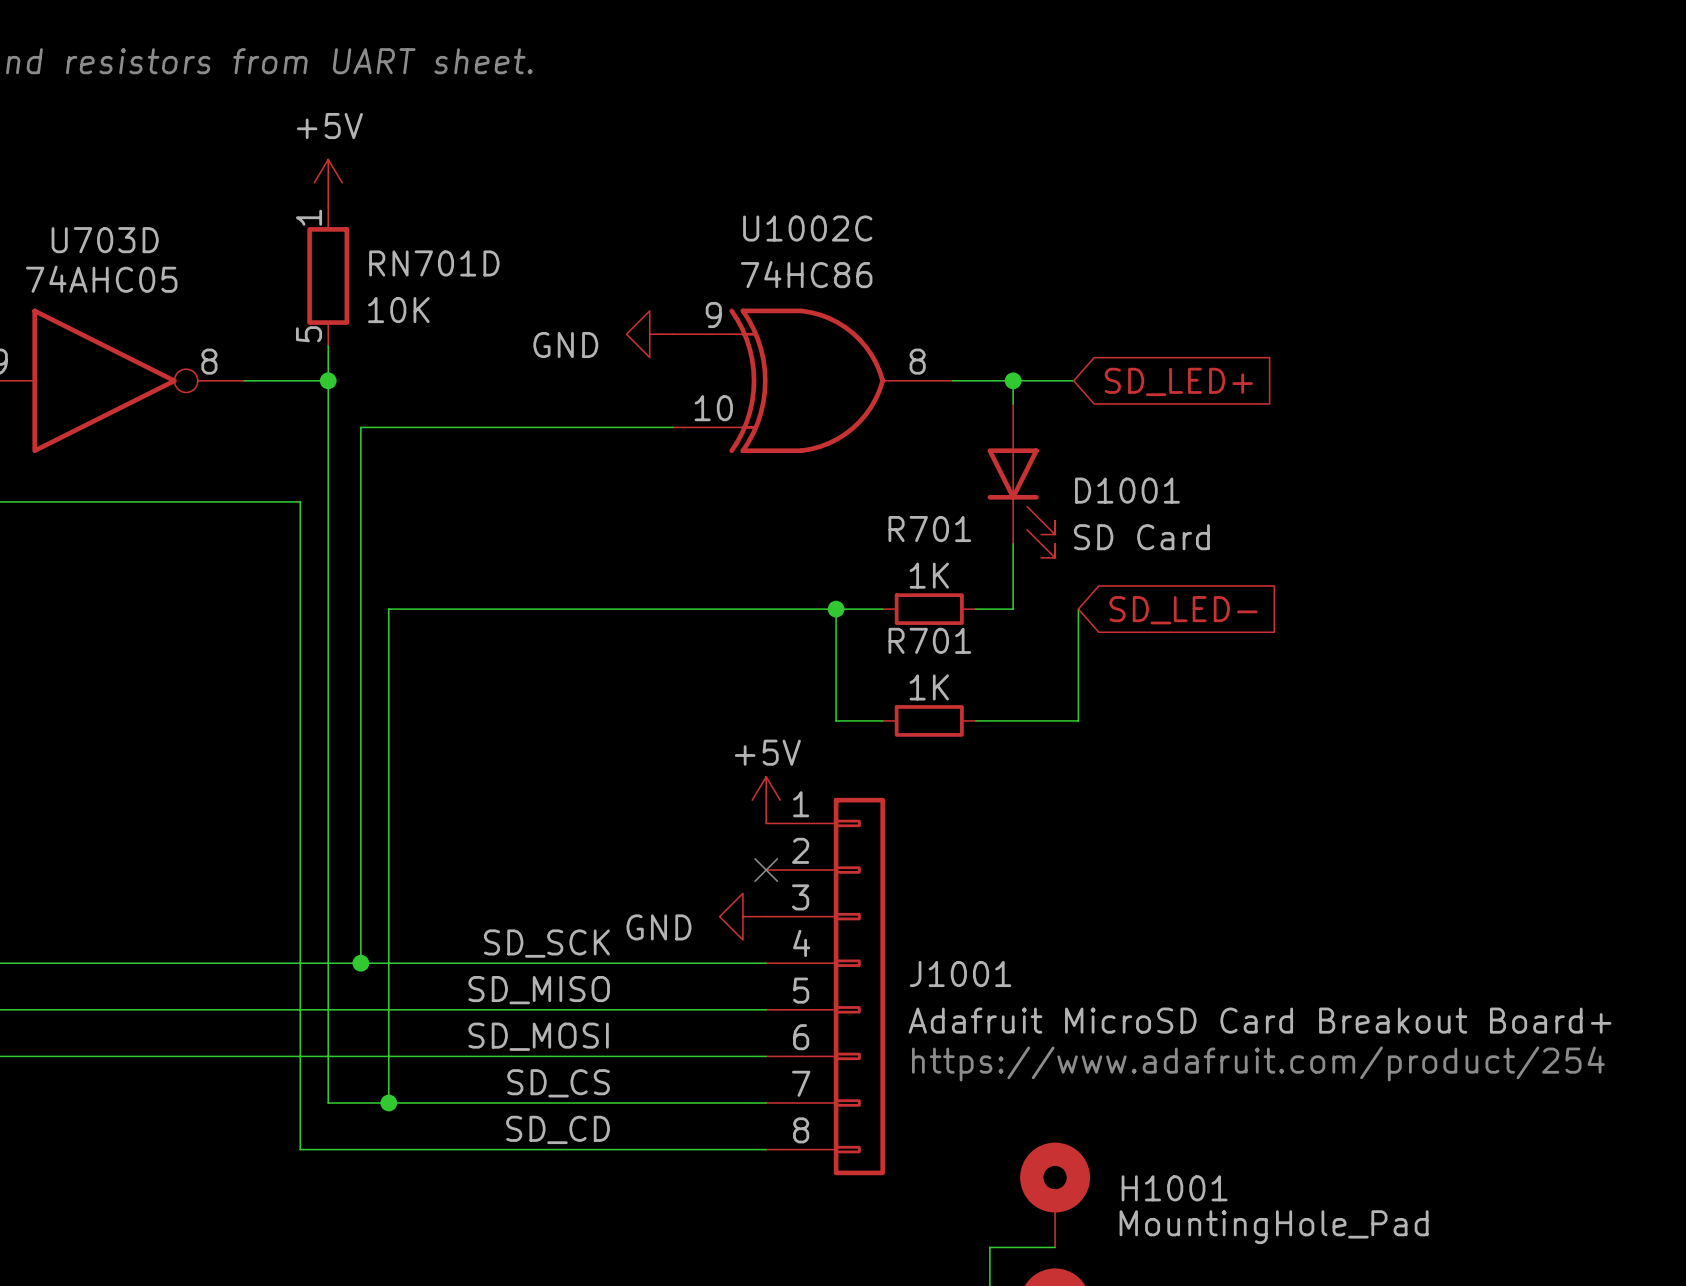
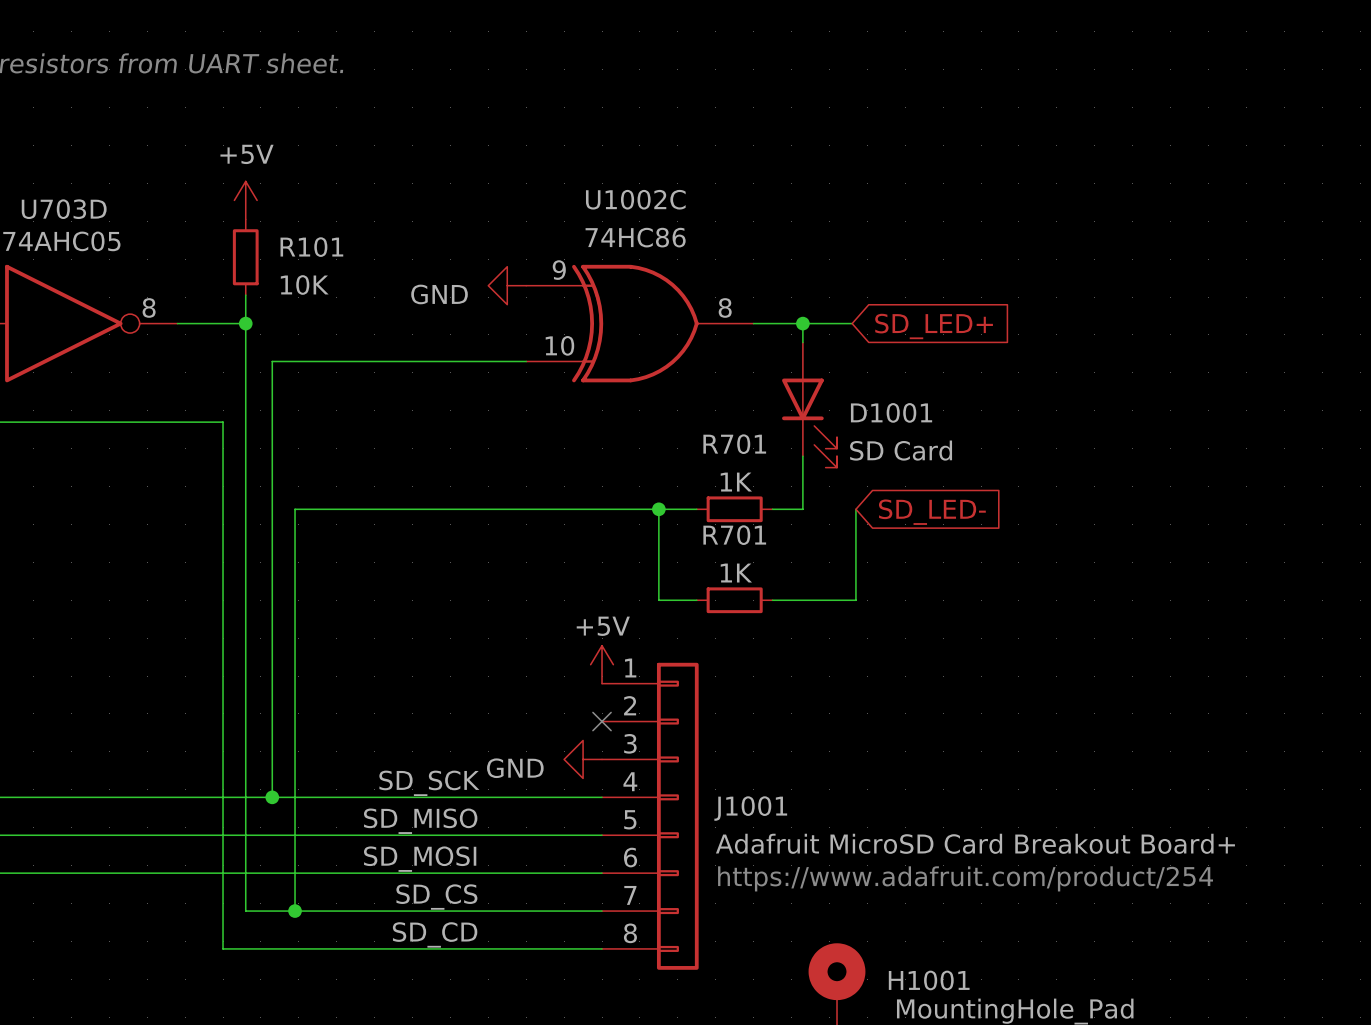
power symbol position: +5V (328, 182) -> +5V (245, 200)
RN701D: 10K (328, 275) -> none
R101: none -> 10K (245, 257)

